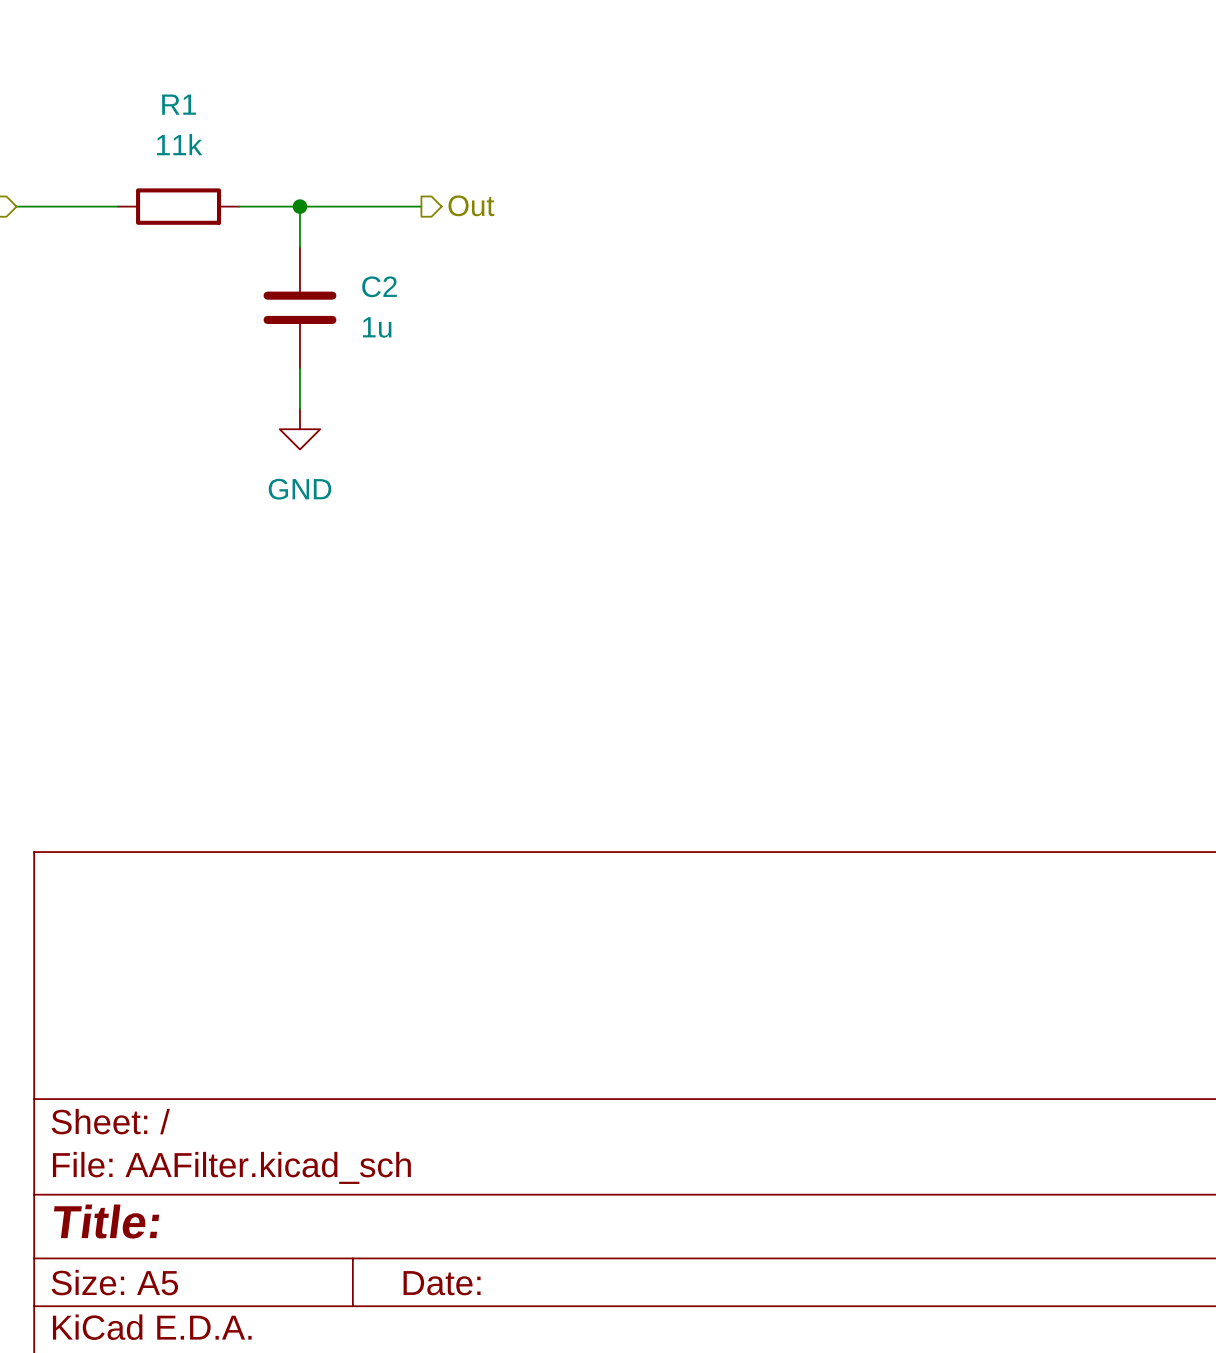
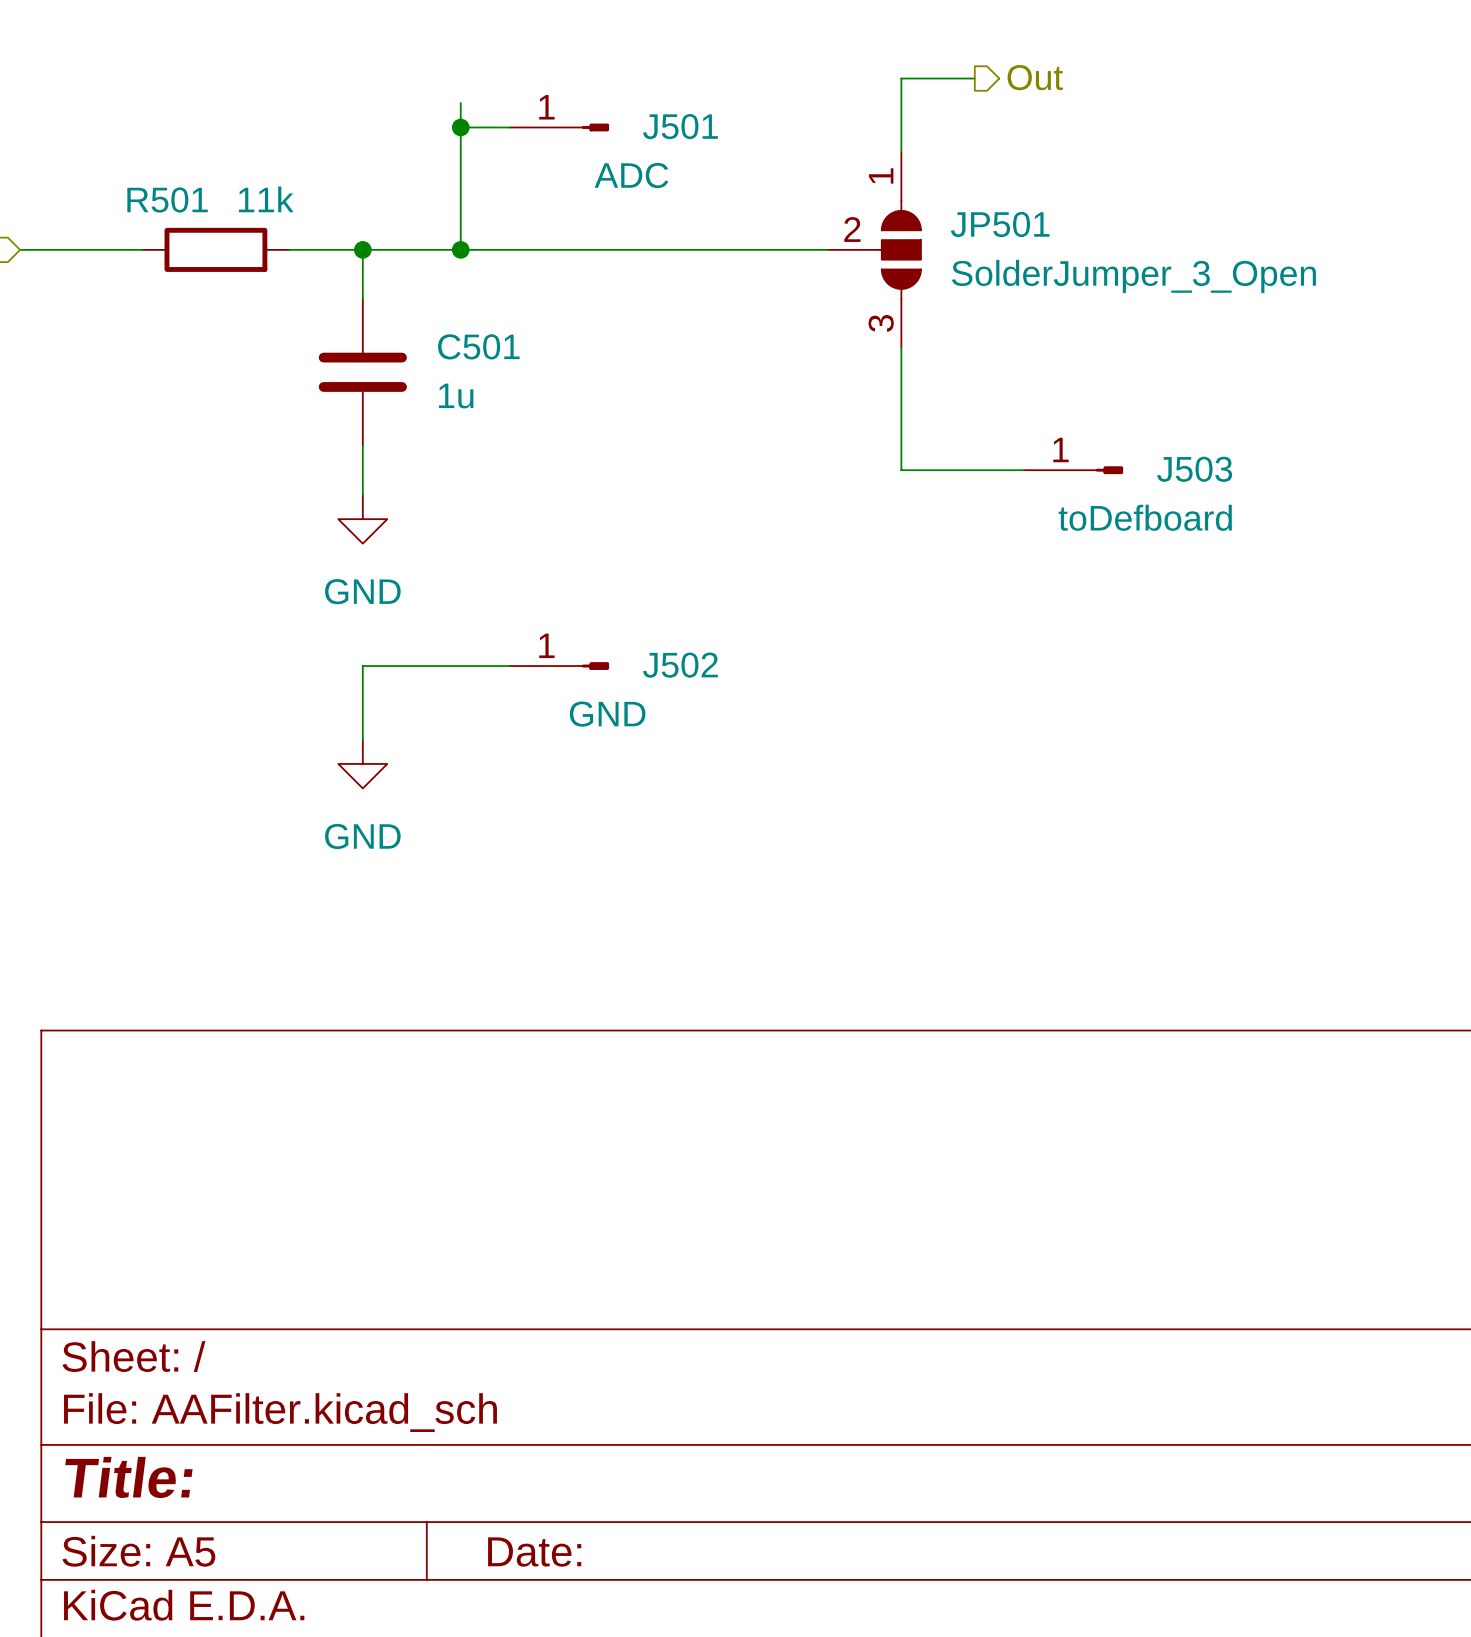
wire: none -> (974, 78) (901, 78) (901, 151)
hierarchical label: none -> Out (1035, 77)
wire: none -> (460, 103) (460, 249)
R1 name: R1 (179, 104) -> R501 (167, 200)
wire: none -> (460, 127) (509, 127)
junction: none -> (460, 127)
J501: none -> ADC (559, 127)
R1 value position: 11k (179, 144) -> 11k (266, 199)
hierarchical label: Out (471, 205) -> none
junction: none -> (460, 249)
wire: none -> (509, 249) (827, 249)
JP501: none -> SolderJumper_3_Open (874, 249)
C2 name: C2 (379, 286) -> C501 (478, 346)
wire: none -> (901, 347) (901, 470) (1023, 470)
J503: none -> toDefboard (1073, 470)
wire: none -> (509, 666) (362, 666) (362, 739)
J502: none -> GND (559, 666)
power symbol: none -> GND (362, 763)

